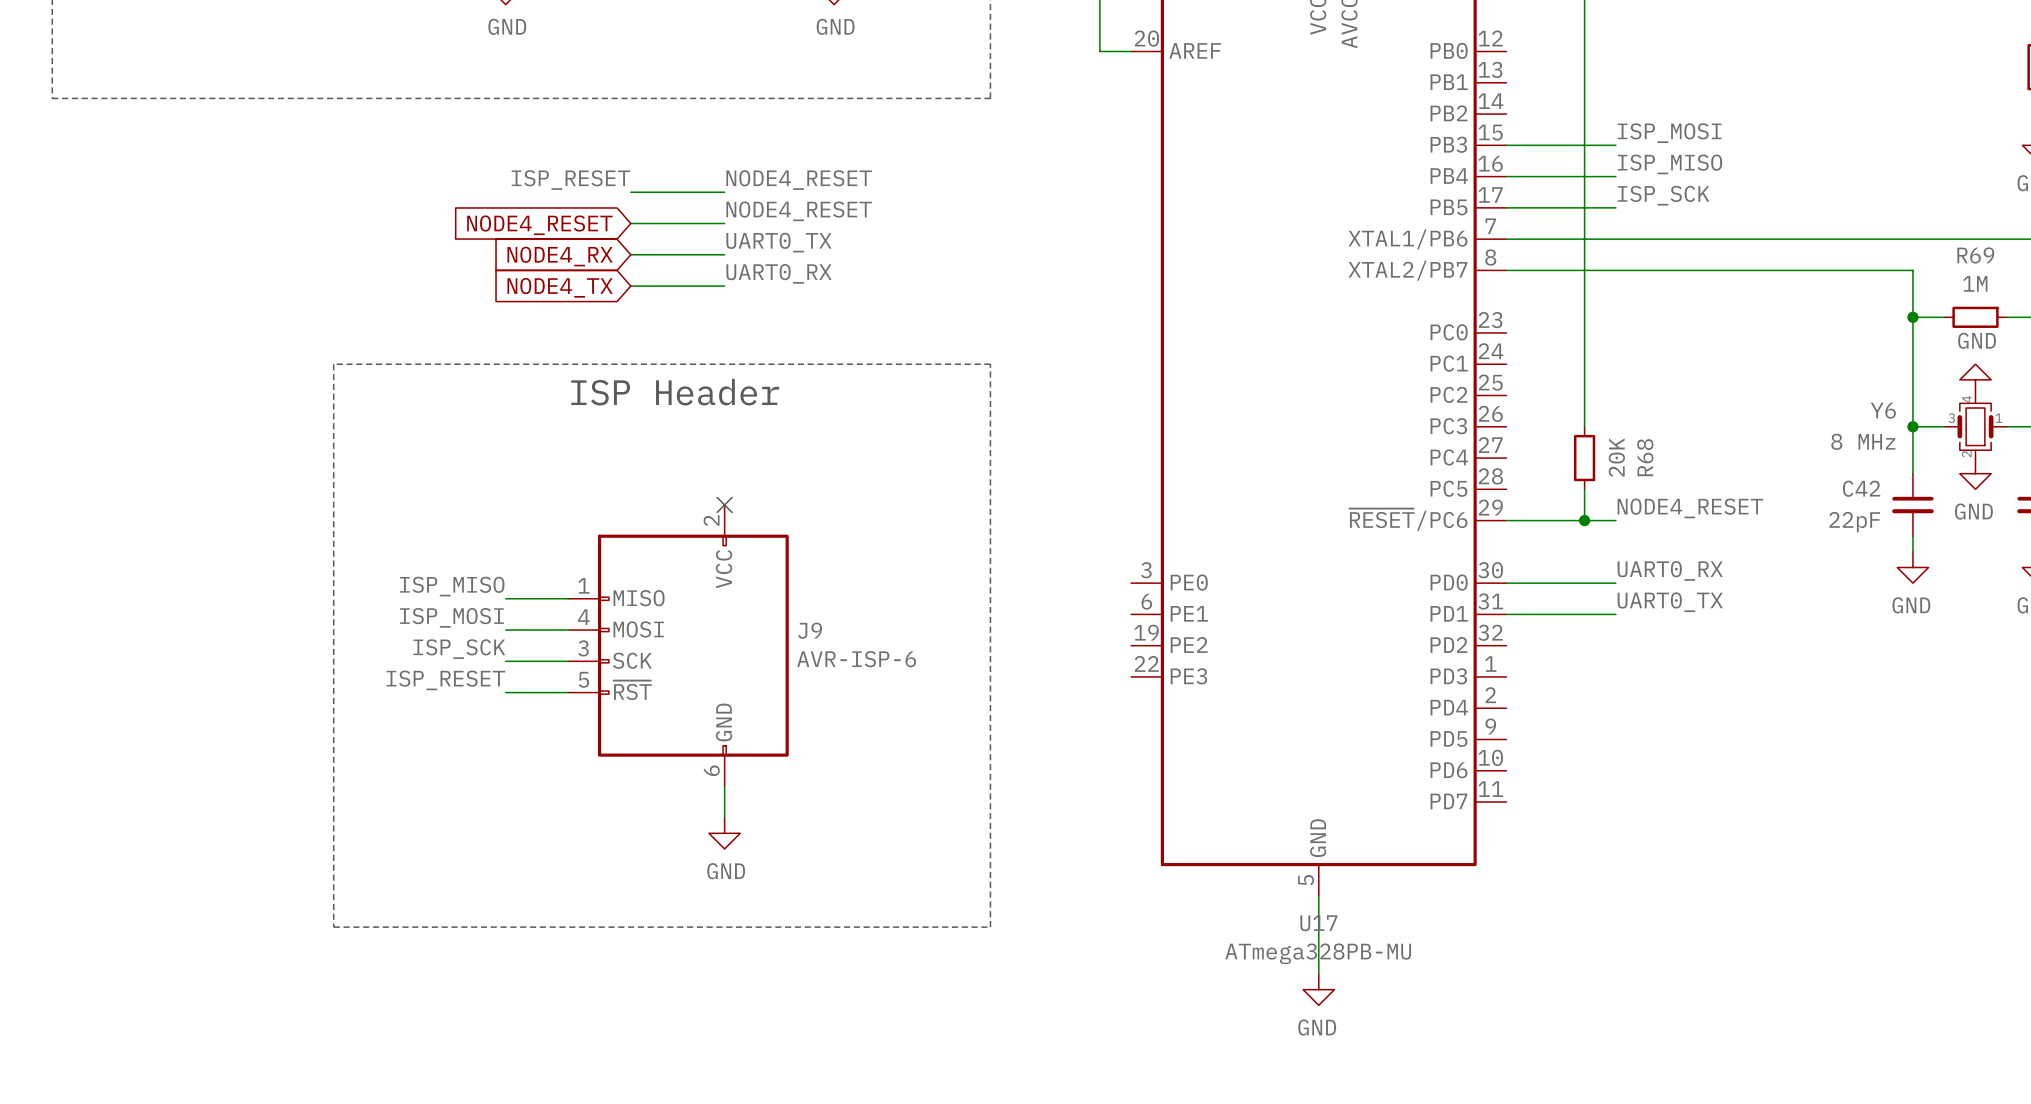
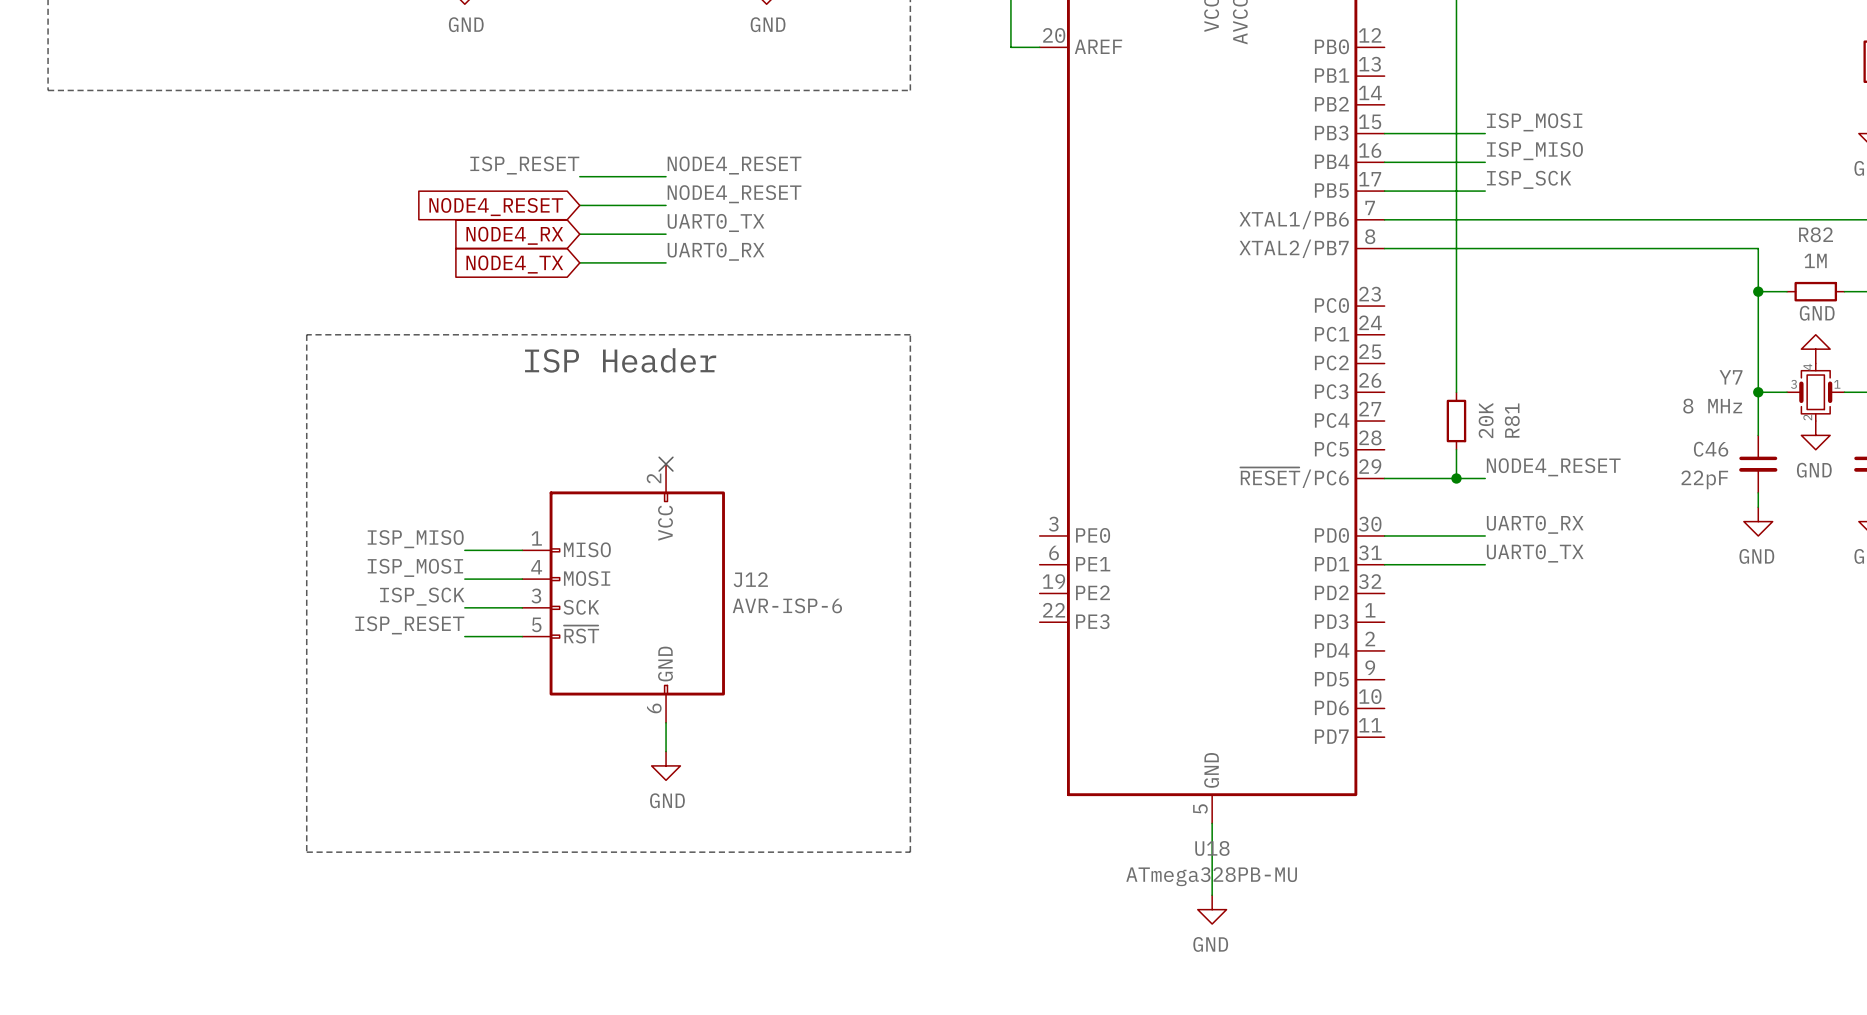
R69 name: R69 (1975, 255) -> R82 (1816, 234)
Y6 name: Y6 (1883, 410) -> Y7 (1731, 377)
R68 name: R68 (1645, 457) -> R81 (1512, 420)
C42 name: C42 (1861, 488) -> C46 (1711, 449)
J9 name: J9 (810, 630) -> J12 (750, 579)
U17 name: U17 (1318, 923) -> U18 (1212, 848)

